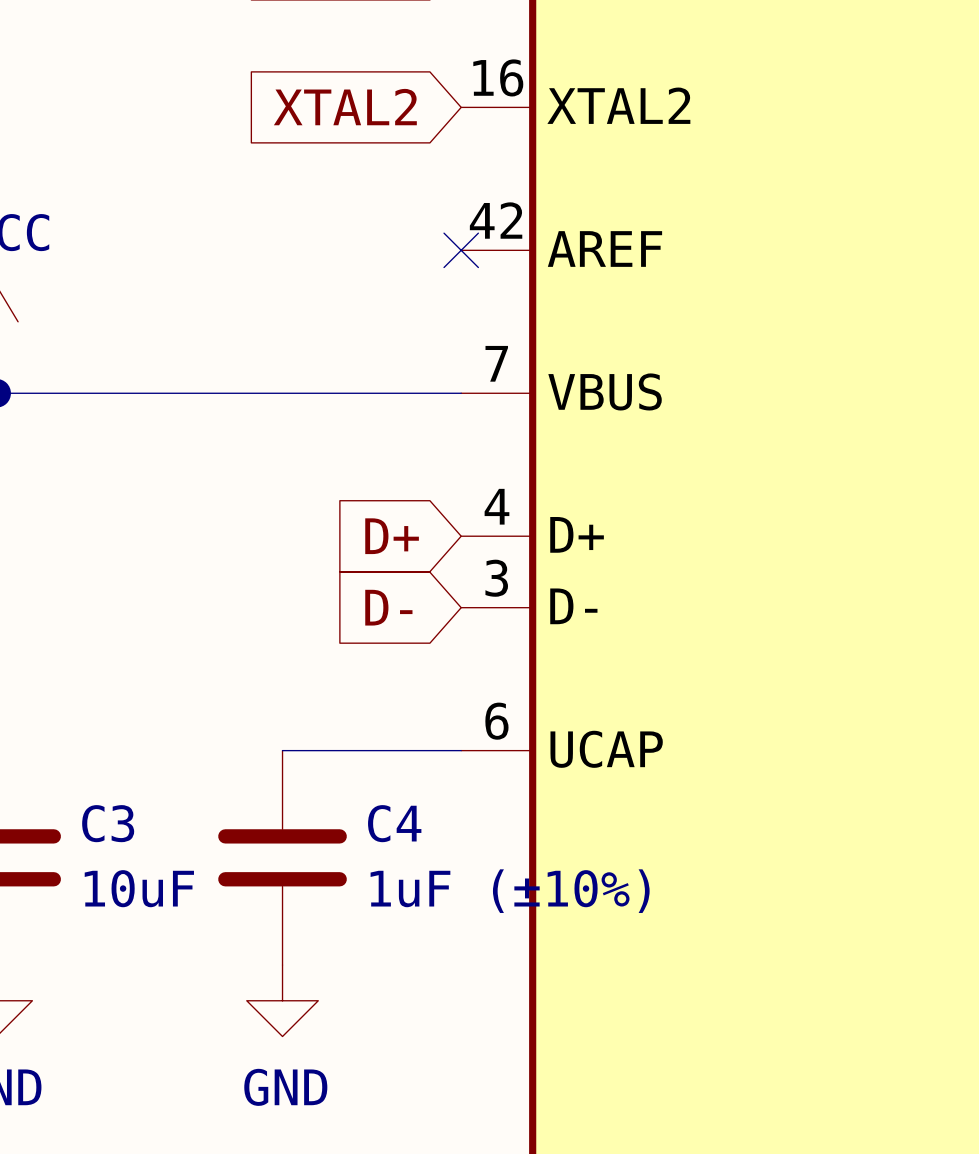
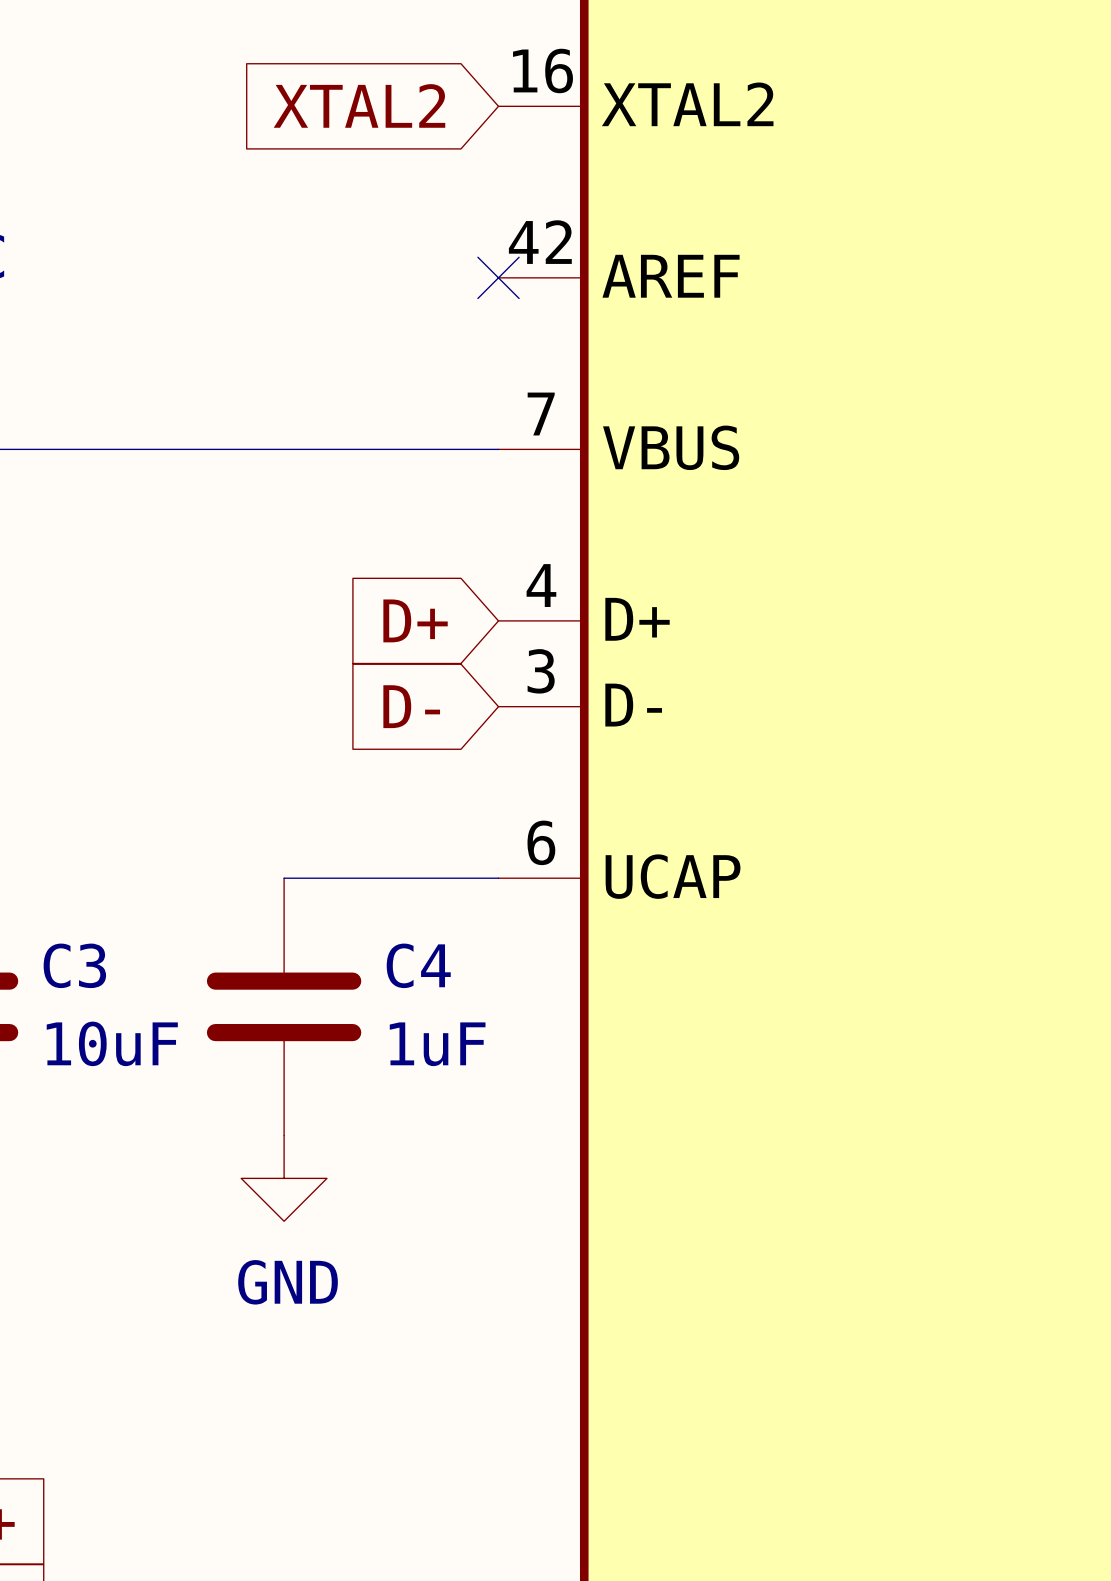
C4 value: 1uF (±10%) (510, 891) -> 1uF (437, 1044)

